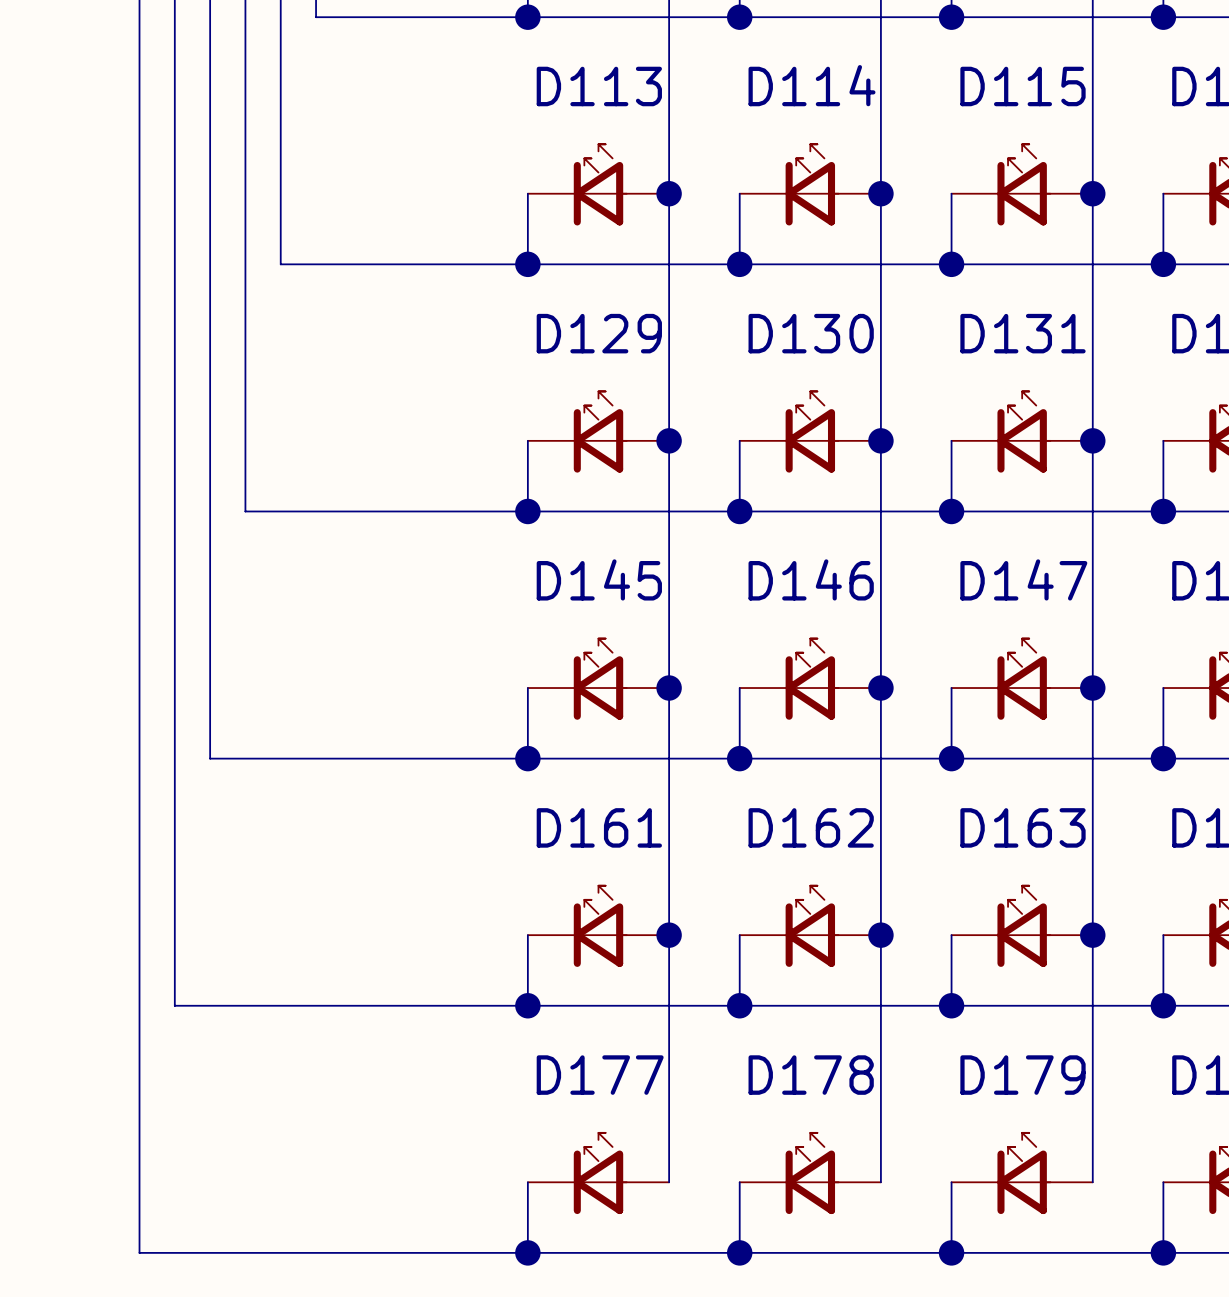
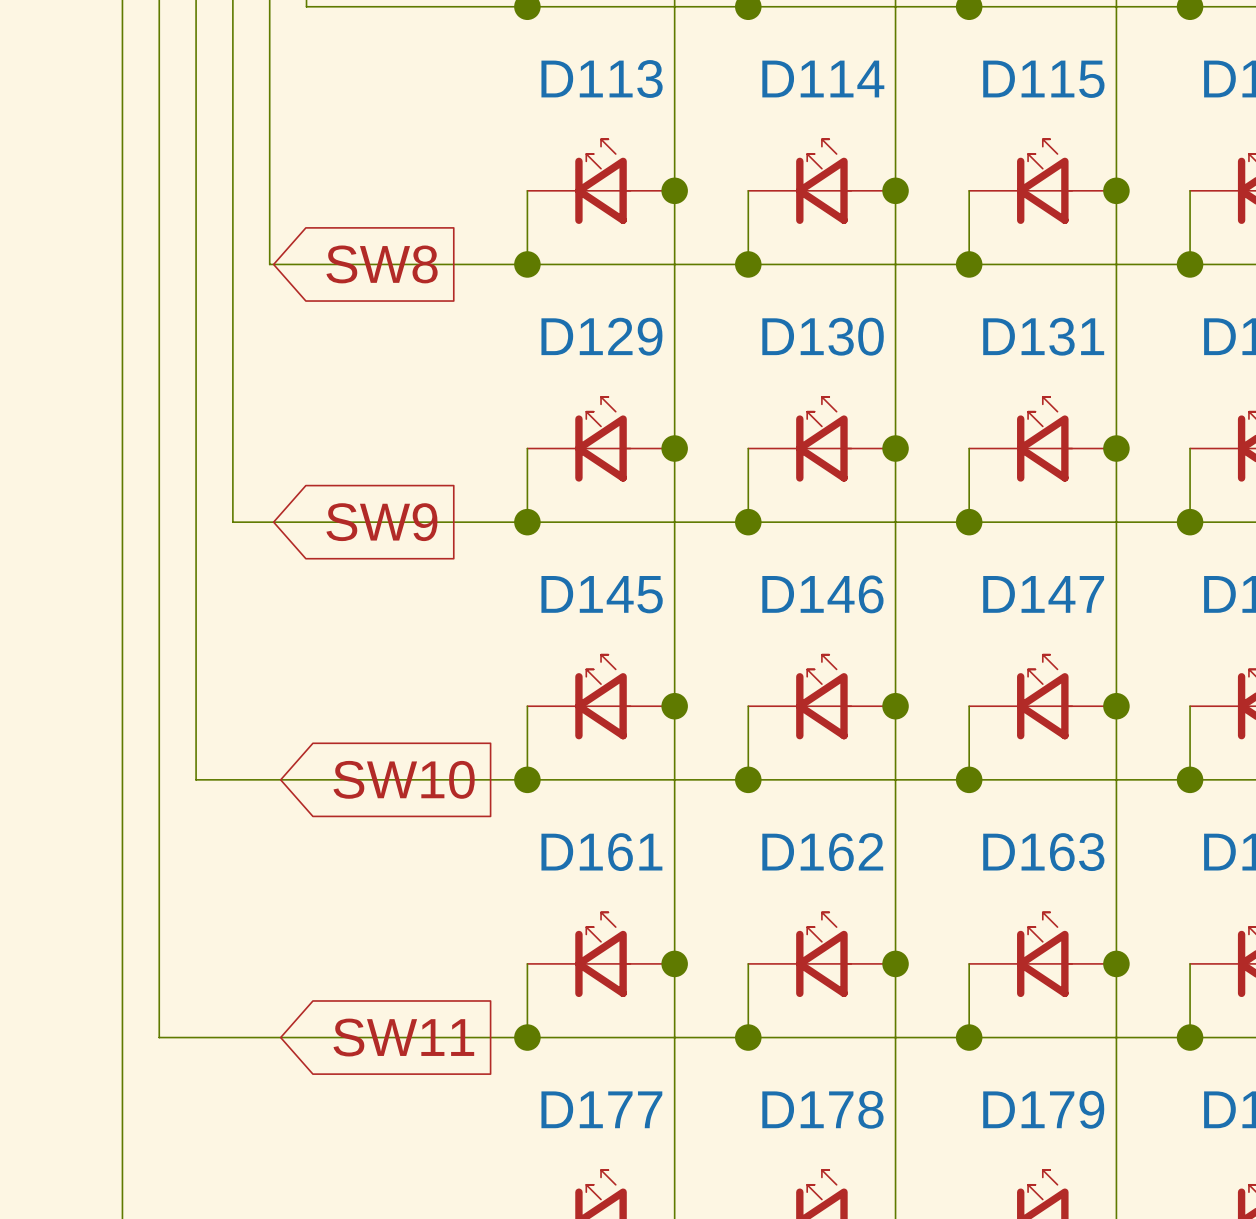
global label: none -> SW8 (382, 264)
global label: none -> SW9 (381, 522)
global label: none -> SW10 (404, 779)
global label: none -> SW11 (403, 1037)

